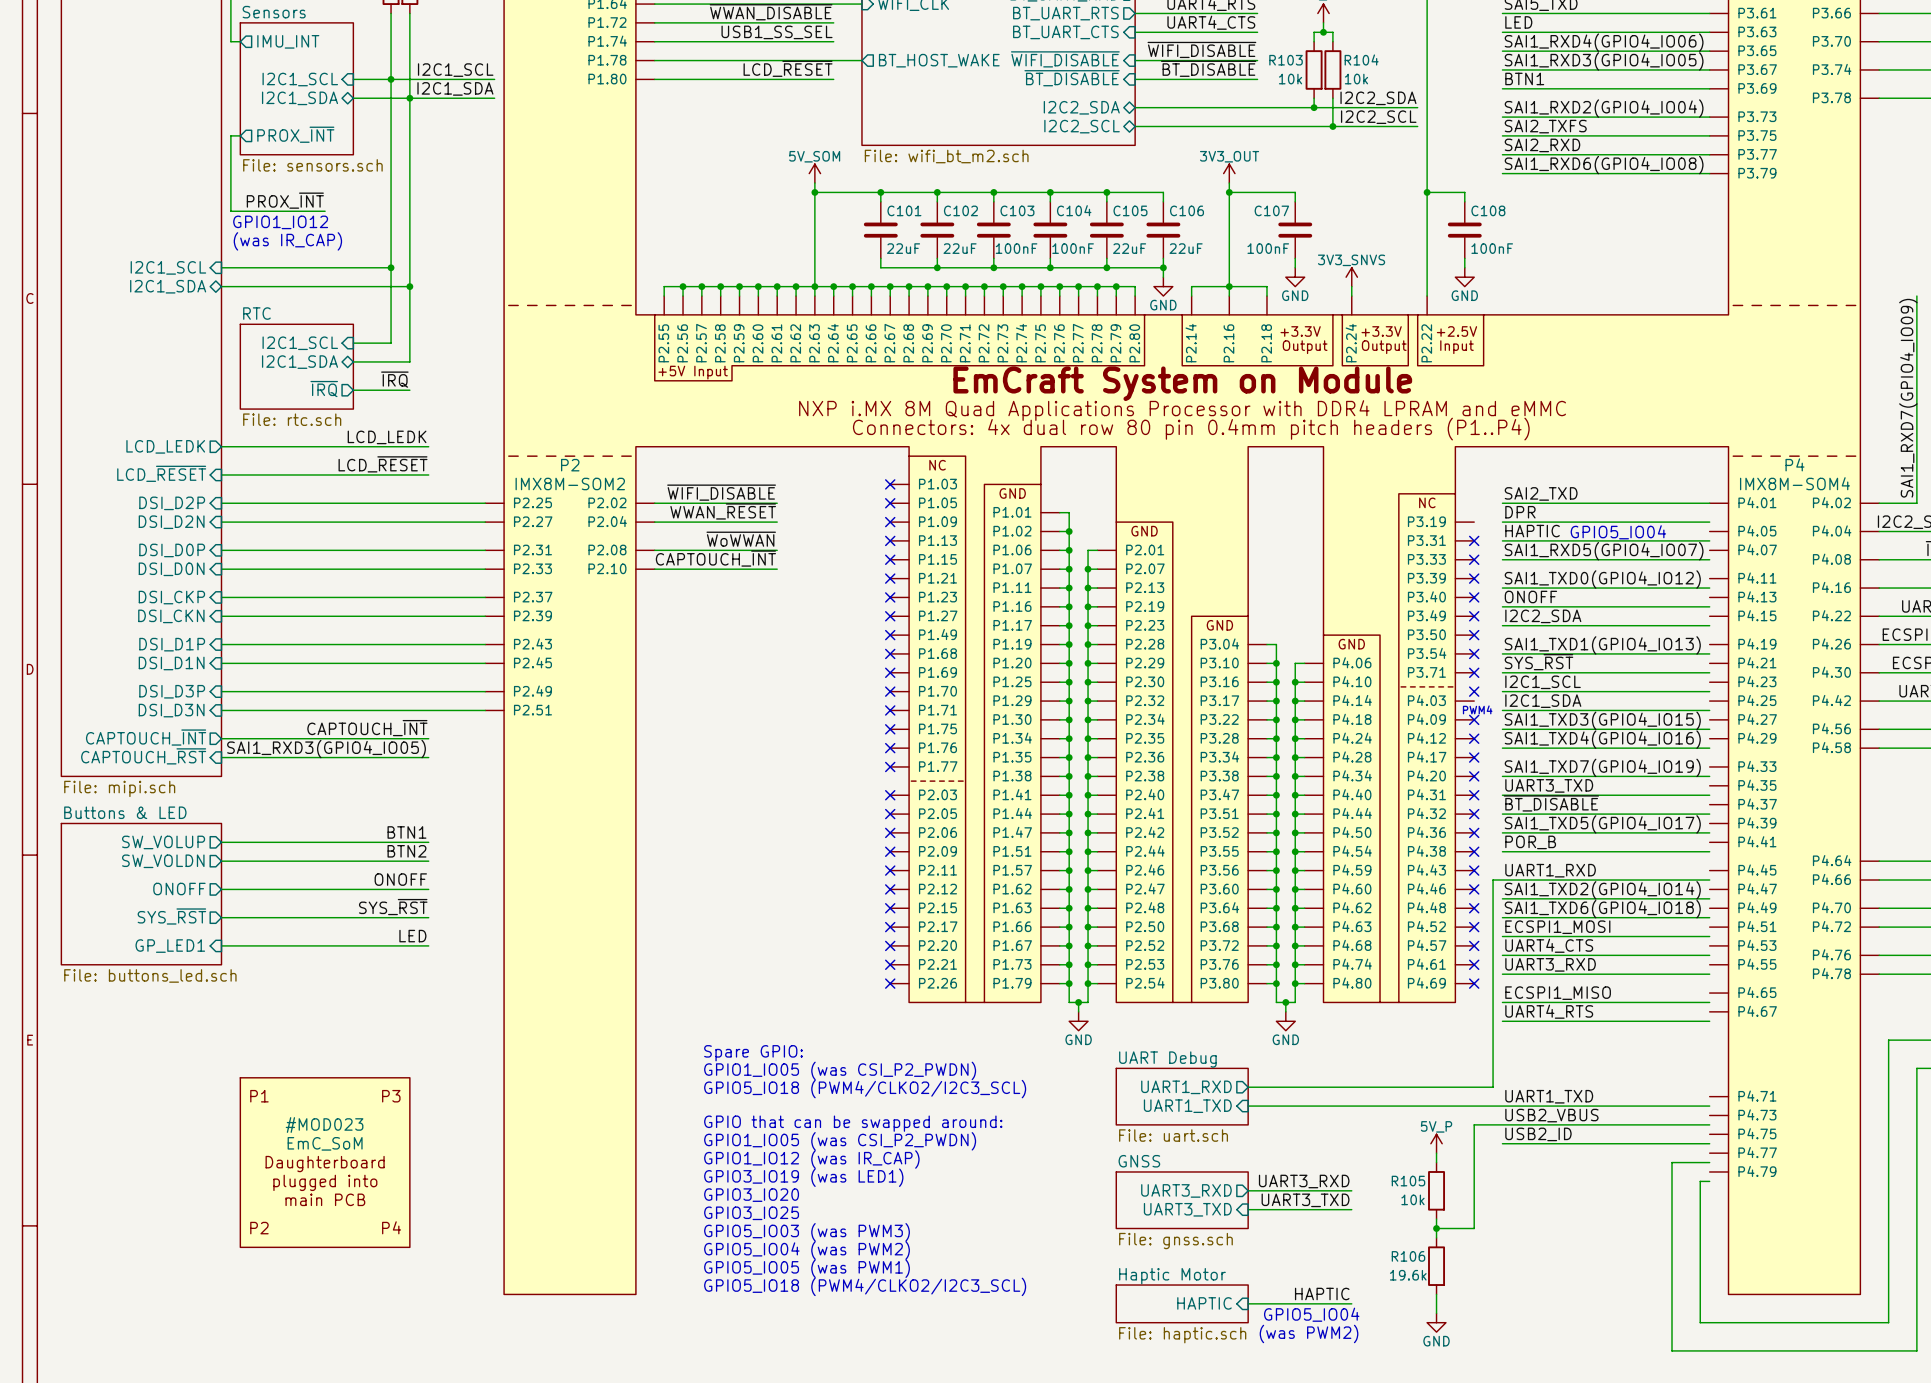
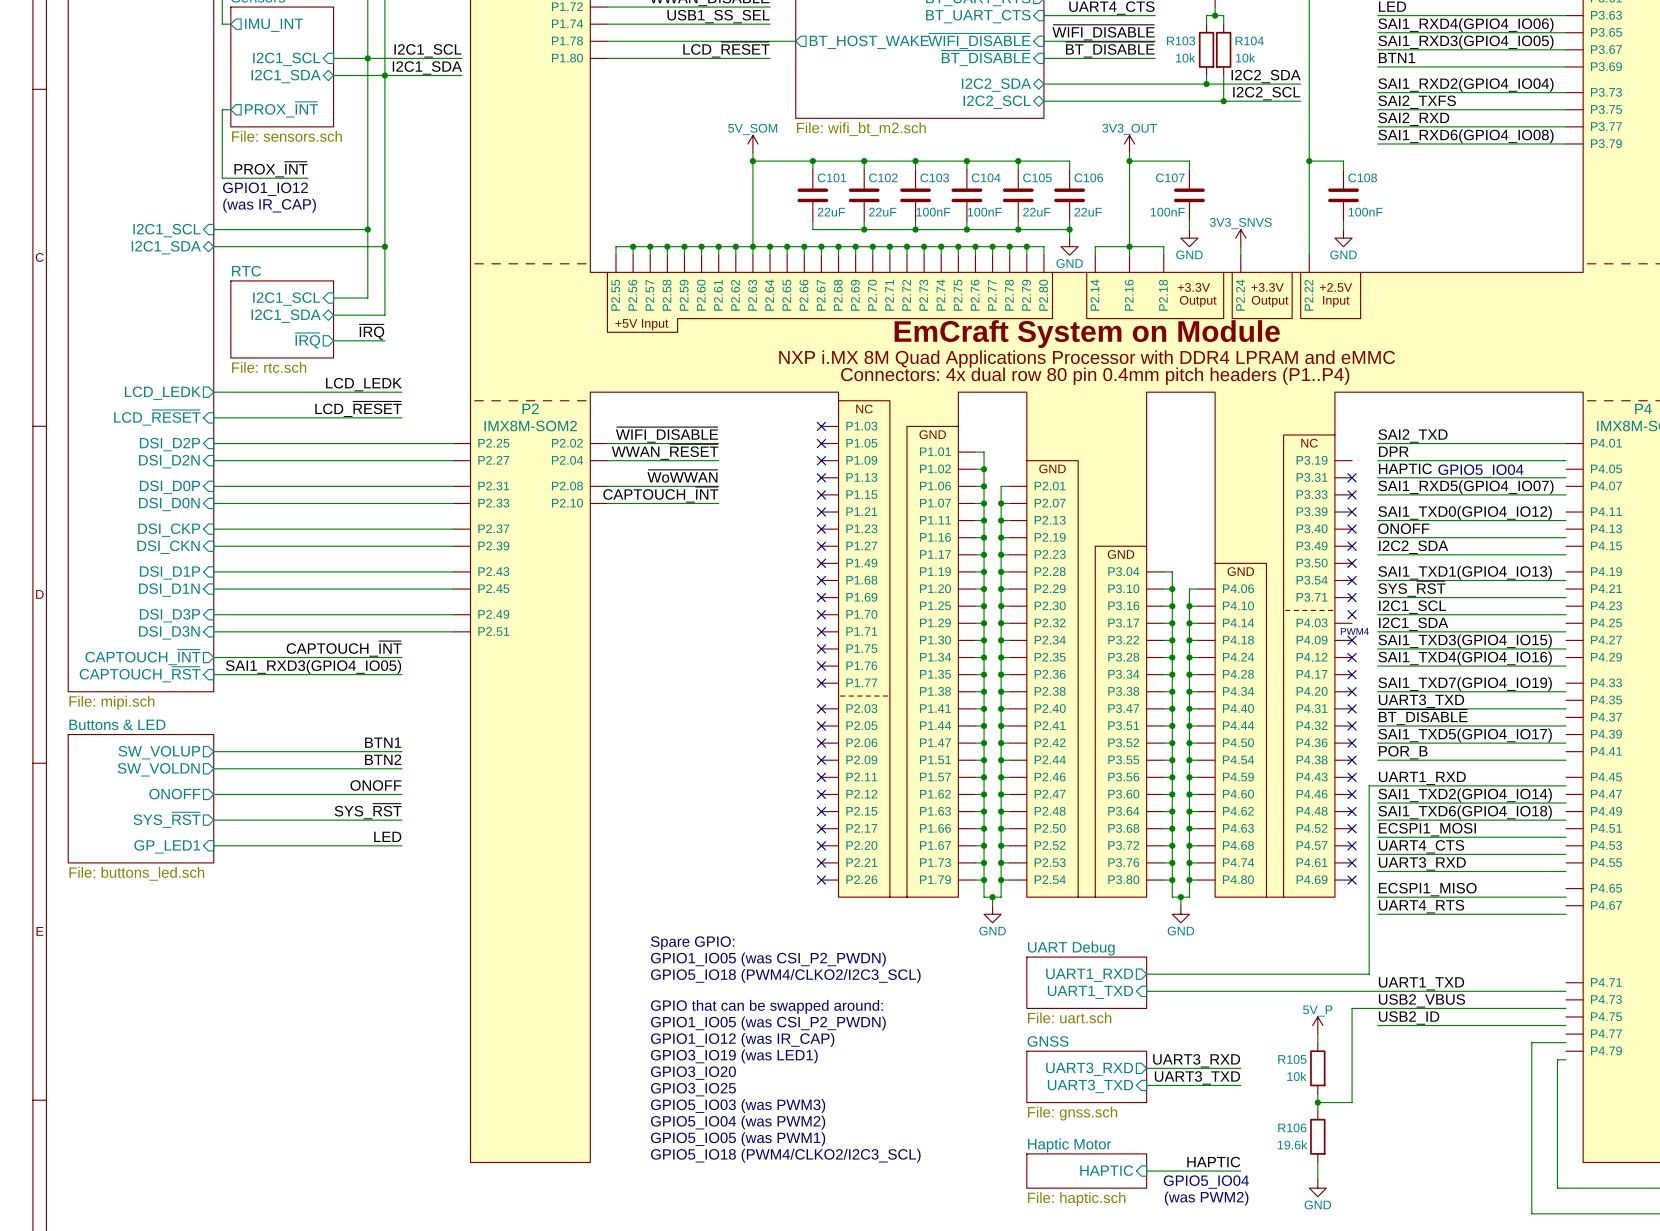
#MOD023: EmC_SoM (325, 1162) -> none

